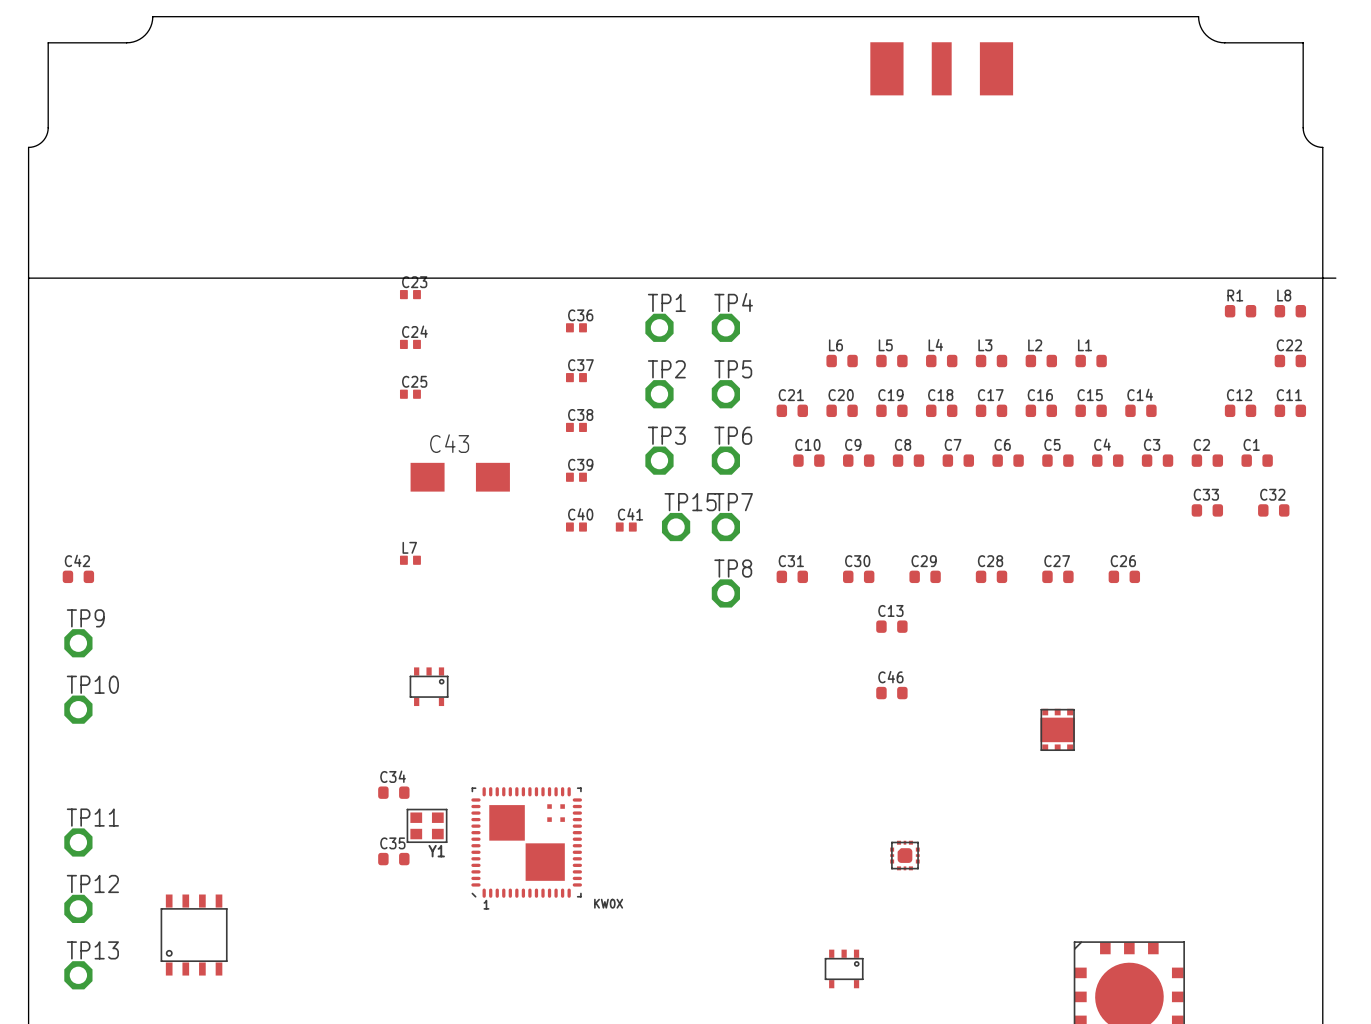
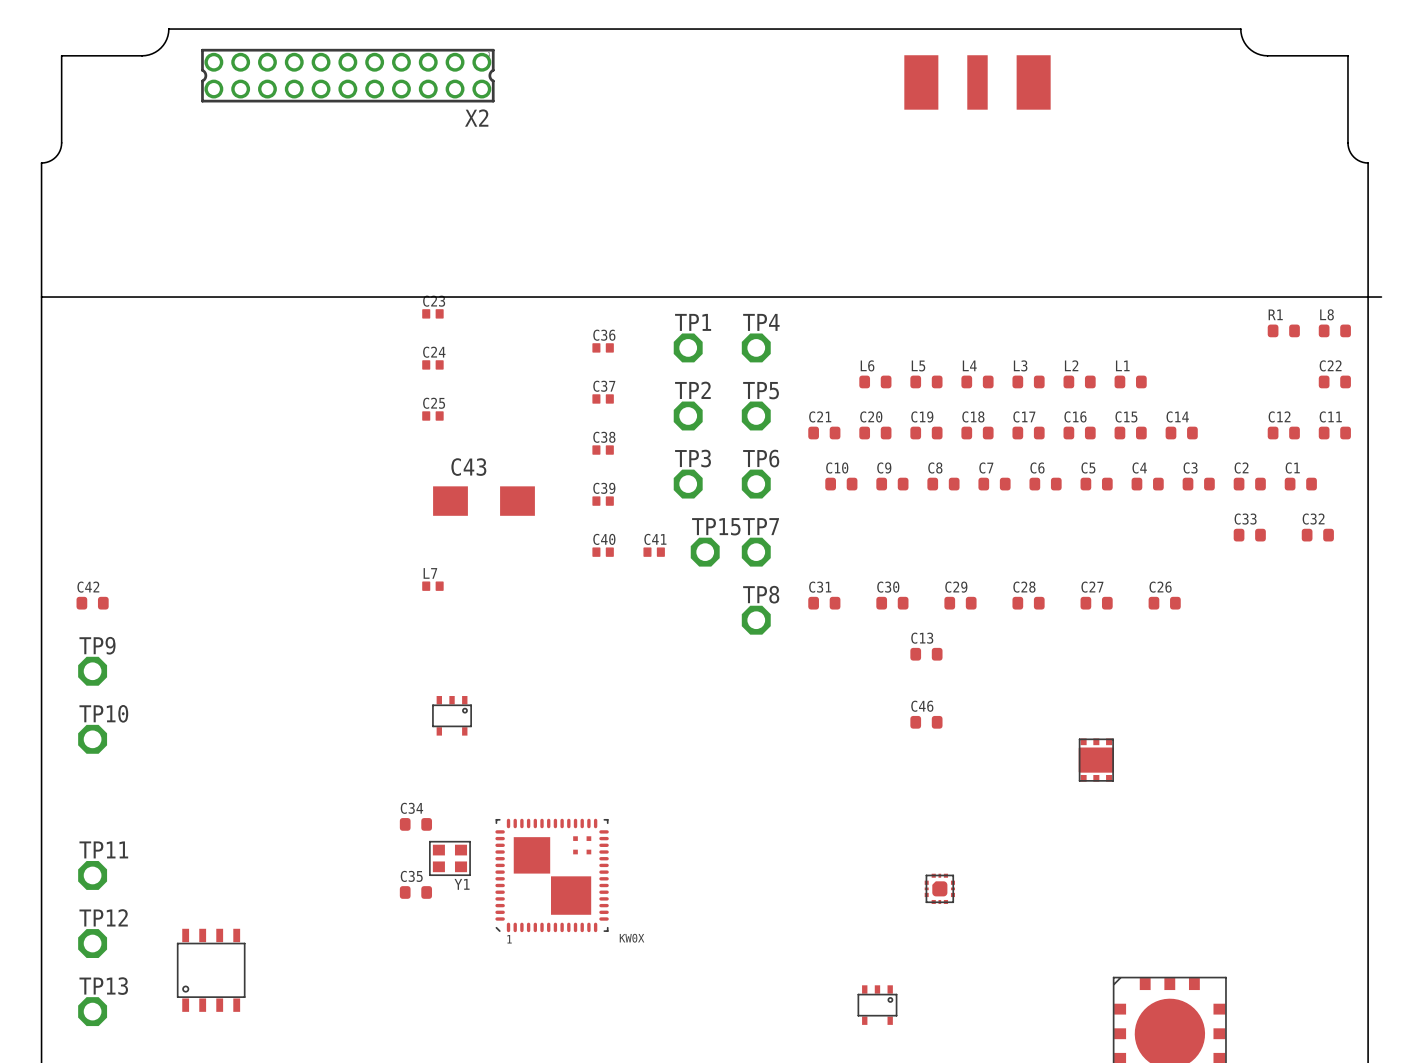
X2: none -> (347, 75)

